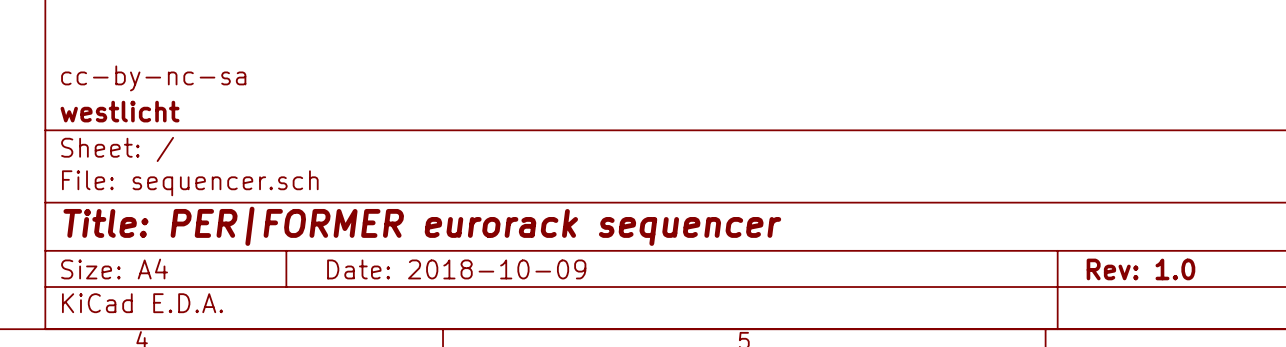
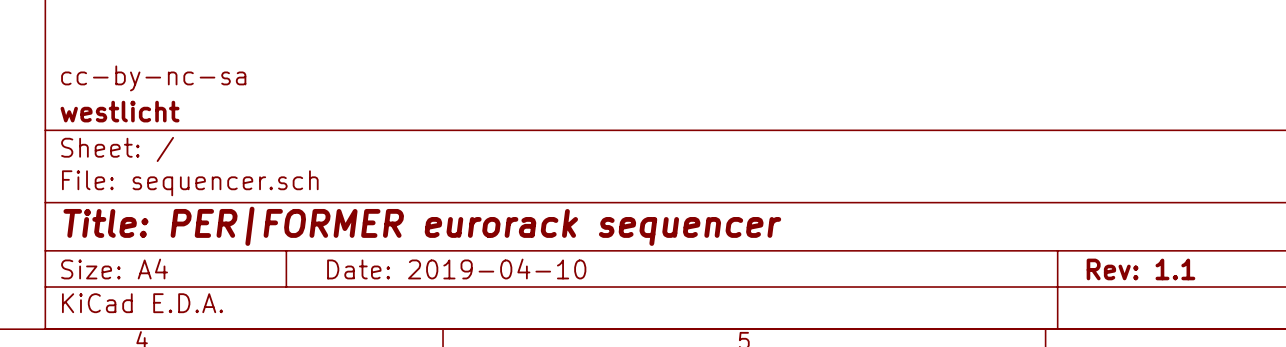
title block: Date: 2018-10-09 (456, 269) -> Date: 2019-04-10 (456, 269)
title block: Rev: 1.0 (1140, 269) -> Rev: 1.1 (1140, 269)

